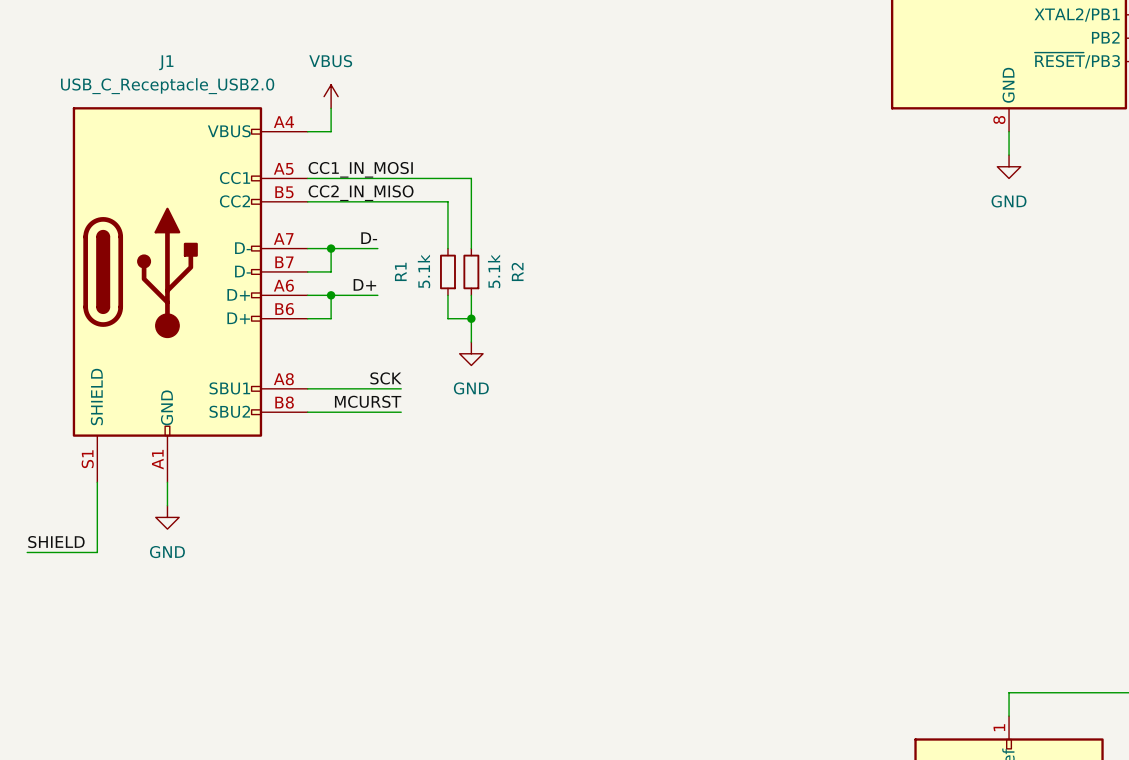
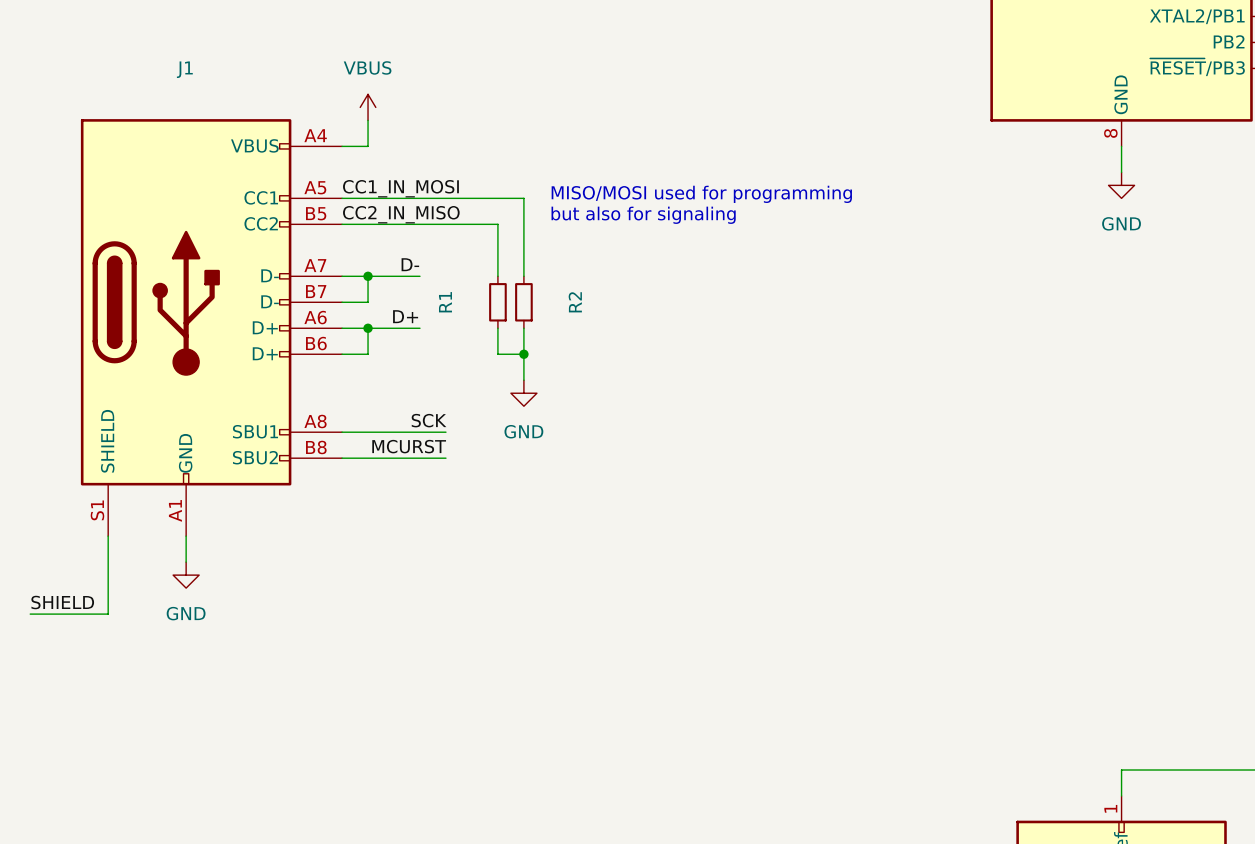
J1 value: USB_C_Receptacle_USB2.0 (167, 86) -> none
text: none -> MISO/MOSI used for programming (701, 194)
text: none -> but also for signaling (643, 215)
R1 value: 5.1k (424, 271) -> none
R2 value: 5.1k (494, 271) -> none

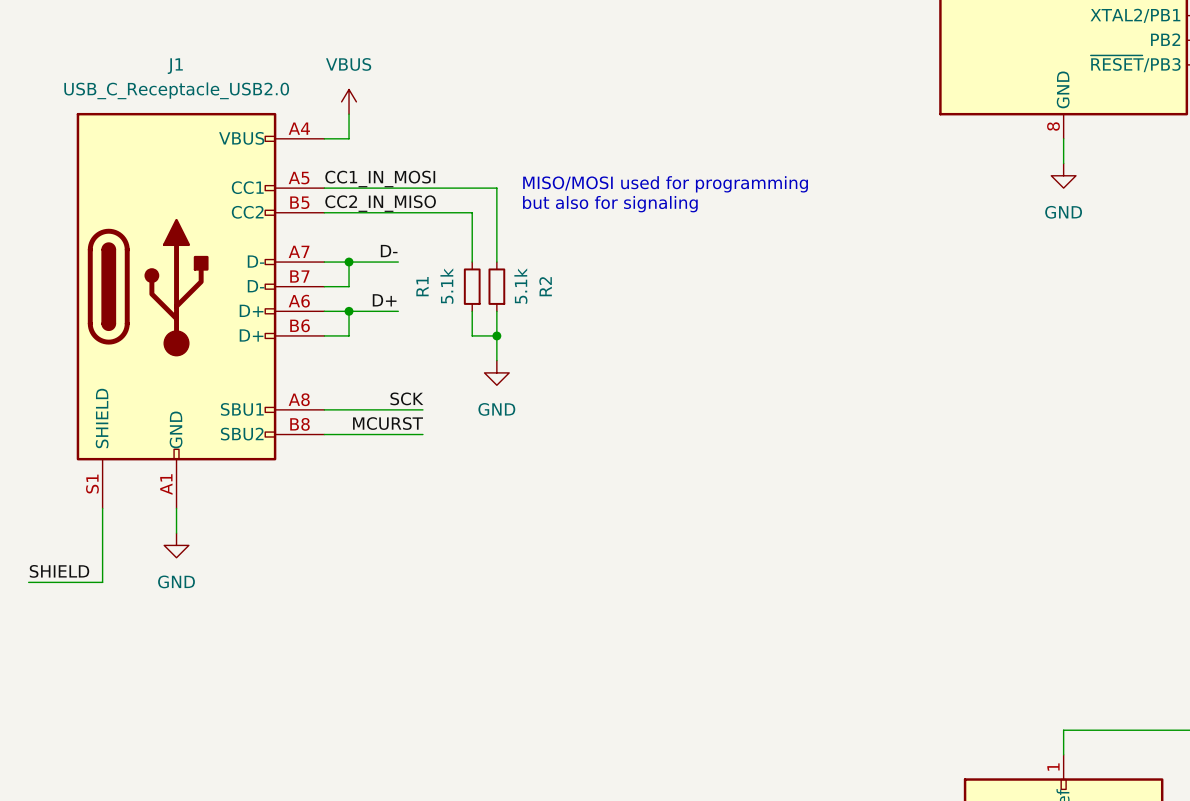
J1 value: none -> USB_C_Receptacle_USB2.0 (176, 90)
R1 value: none -> 5.1k (446, 286)
R2 value: none -> 5.1k (520, 286)

